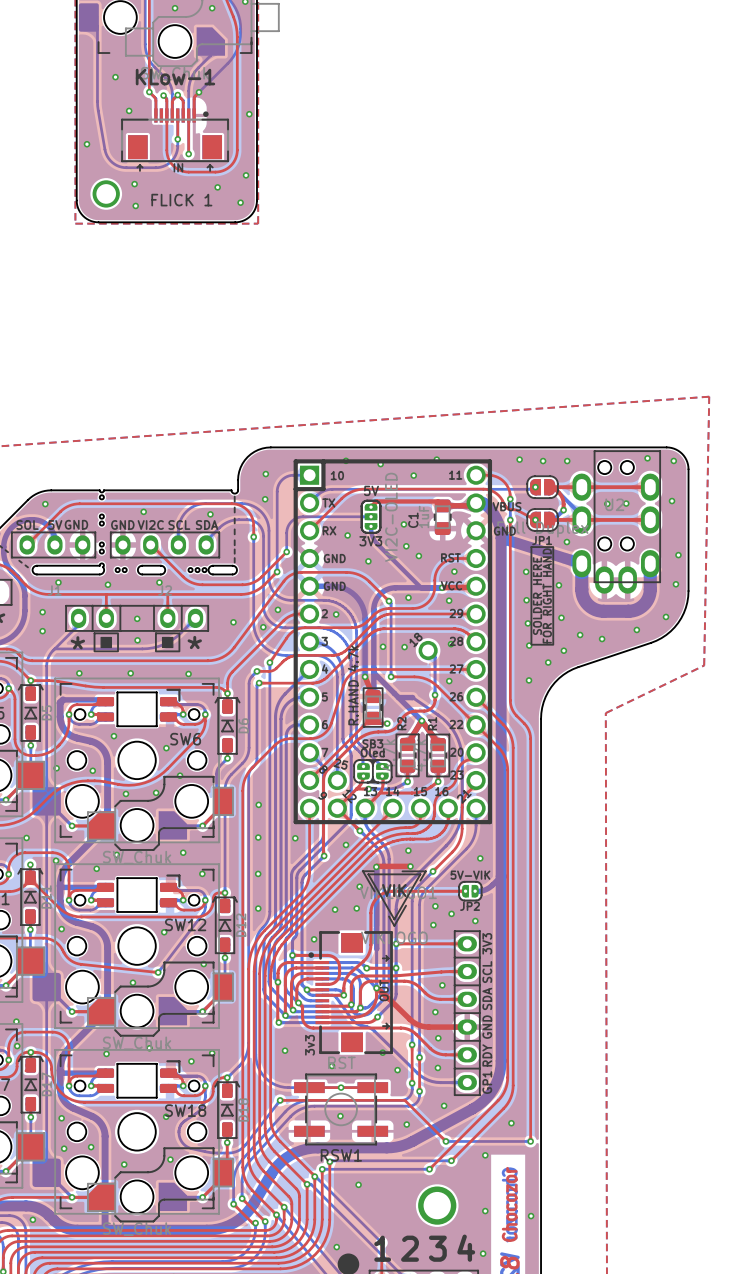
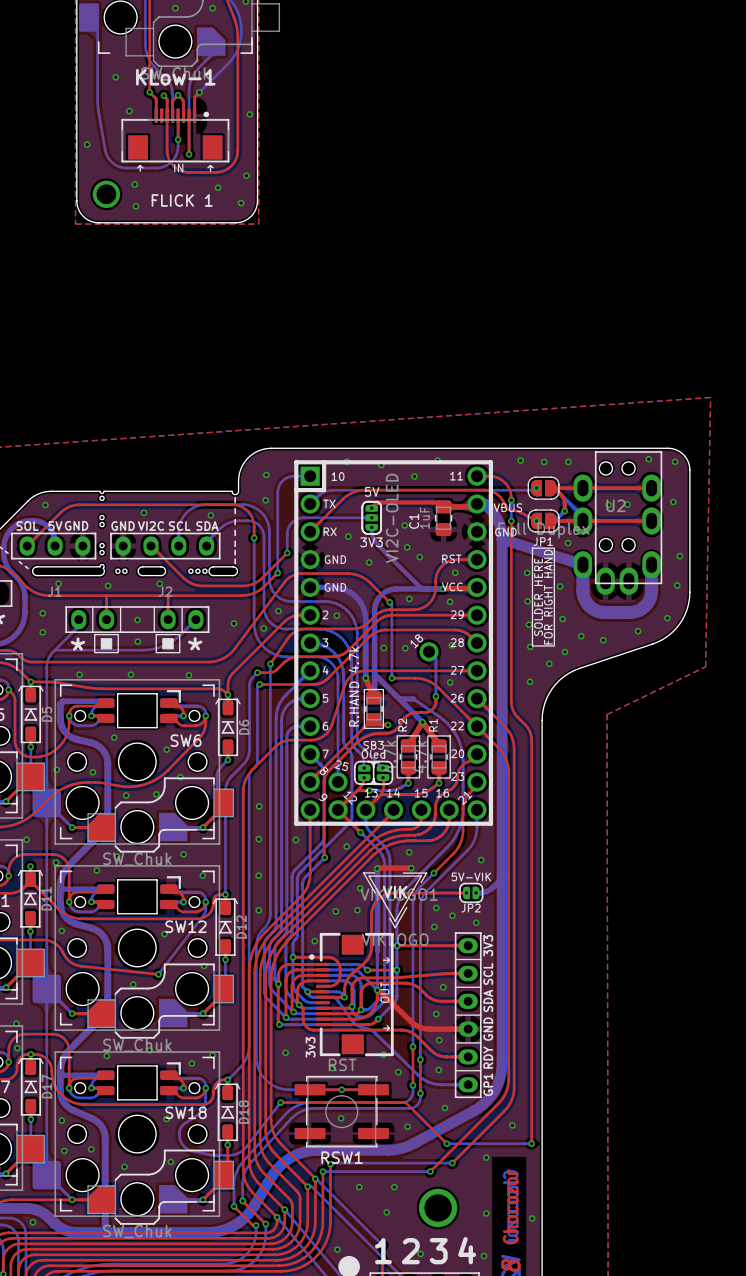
via: none -> (394, 1187)
via: none -> (386, 1212)
via: none -> (420, 1253)

